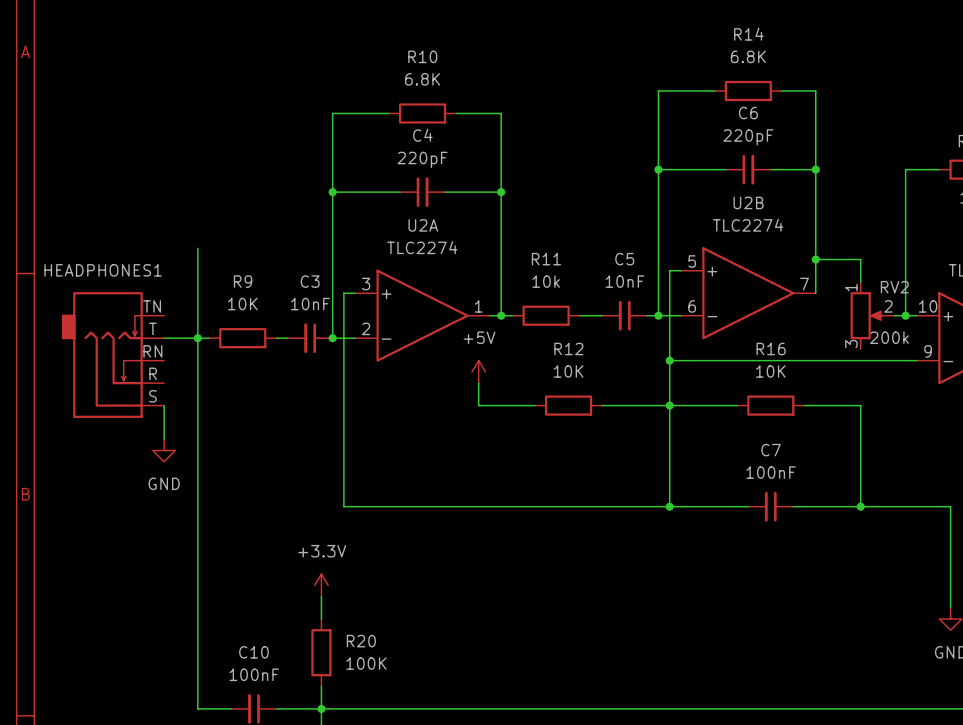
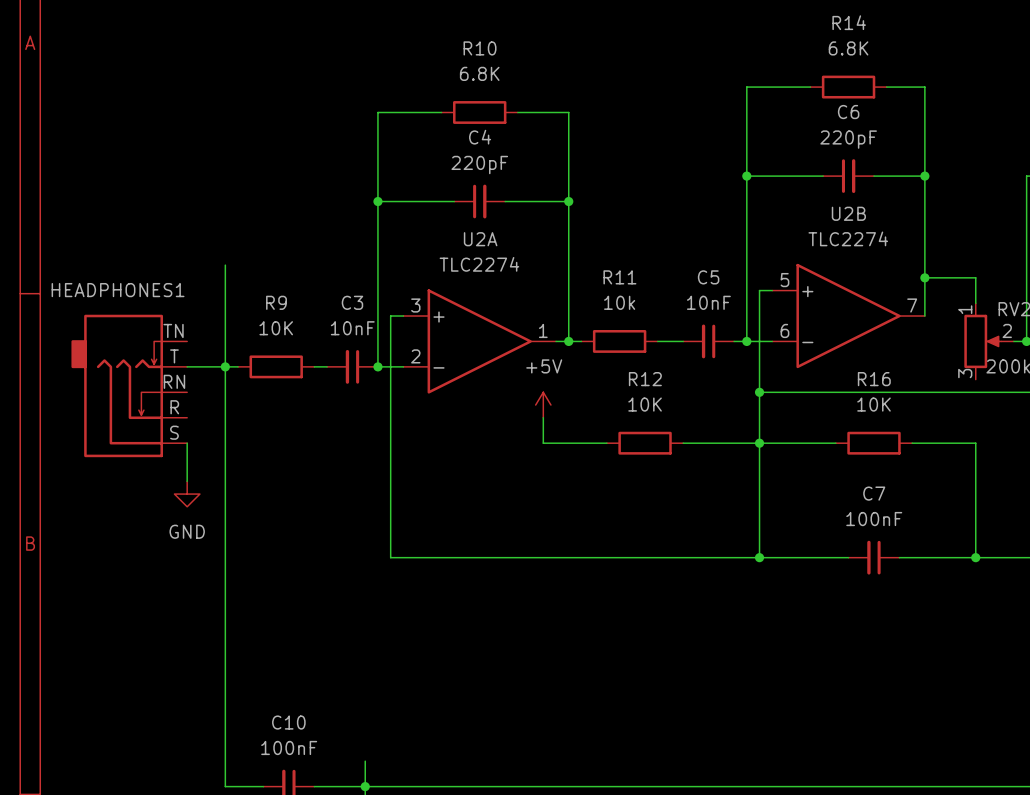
power symbol: +3.3V (321, 585) -> none
wire: (321, 596) (321, 619) -> none
R20: 100K (321, 652) -> none

